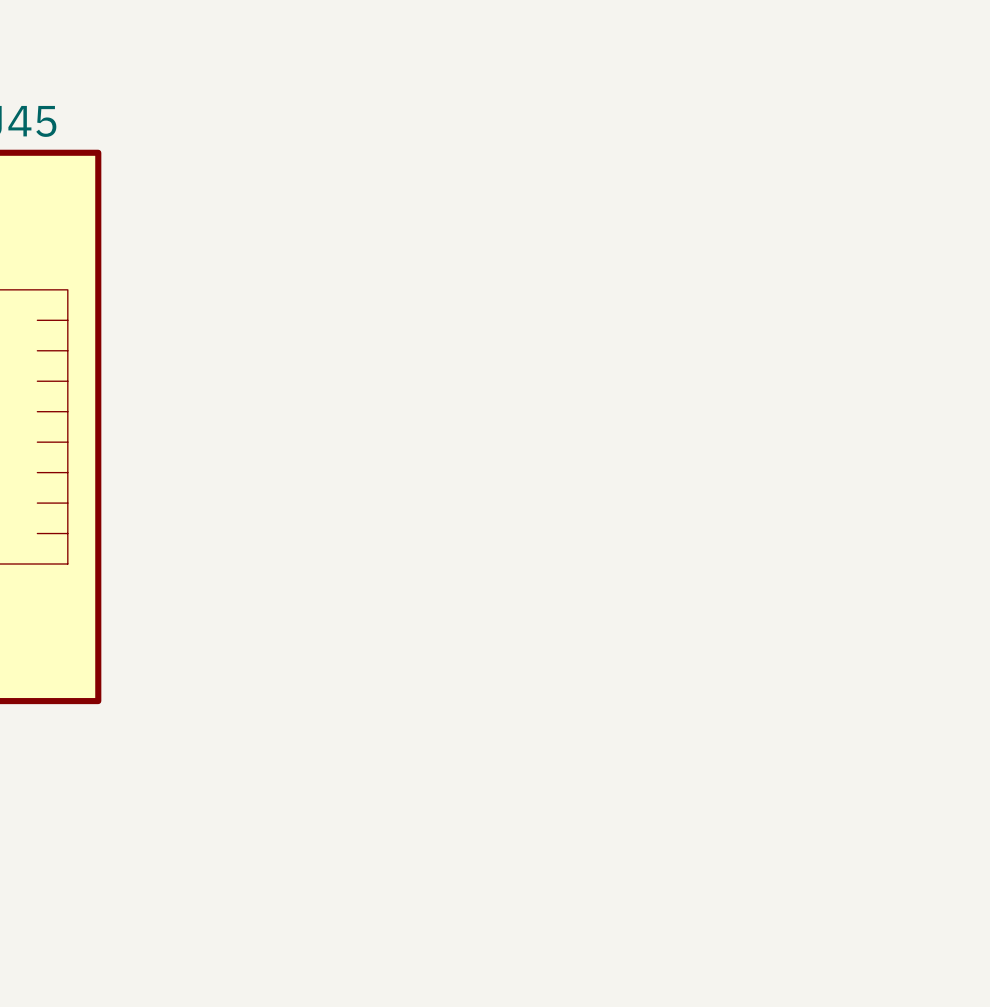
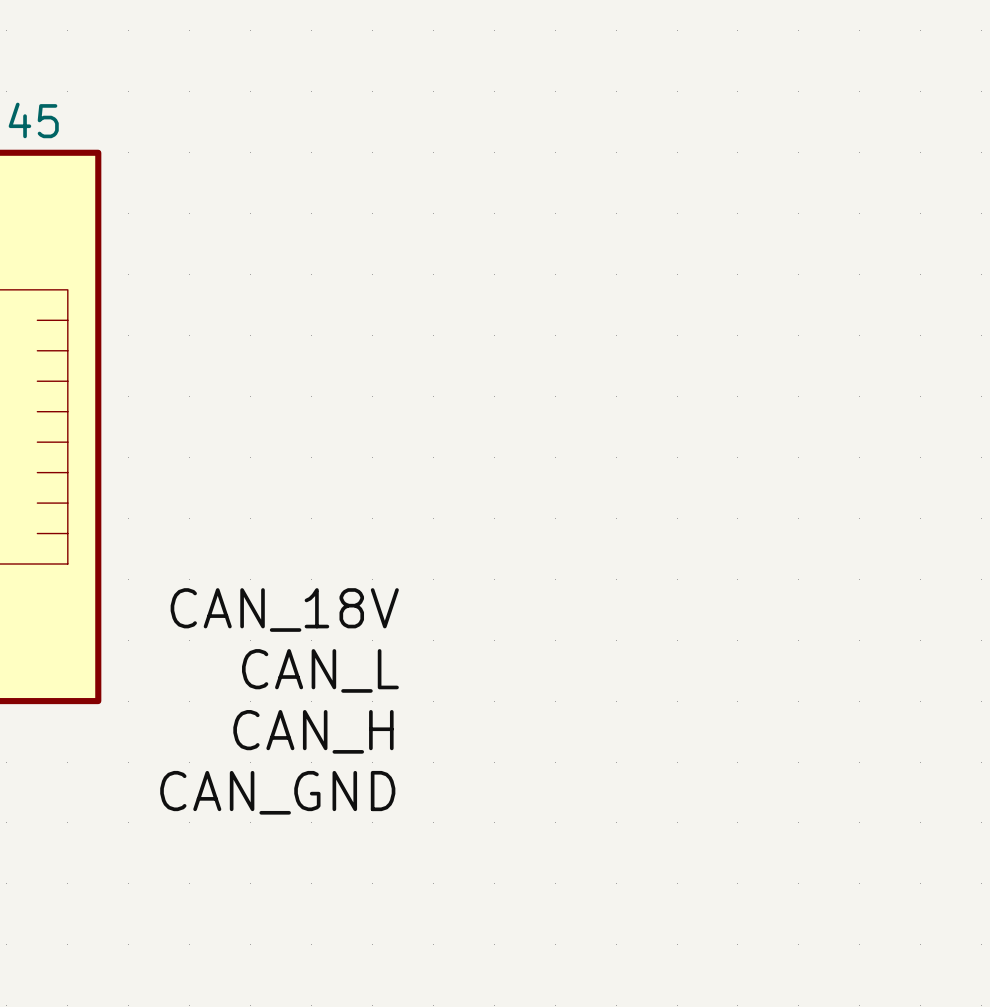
label: none -> CAN_18V (284, 610)
label: none -> CAN_L (320, 670)
label: none -> CAN_H (313, 731)
label: none -> CAN_GND (277, 792)

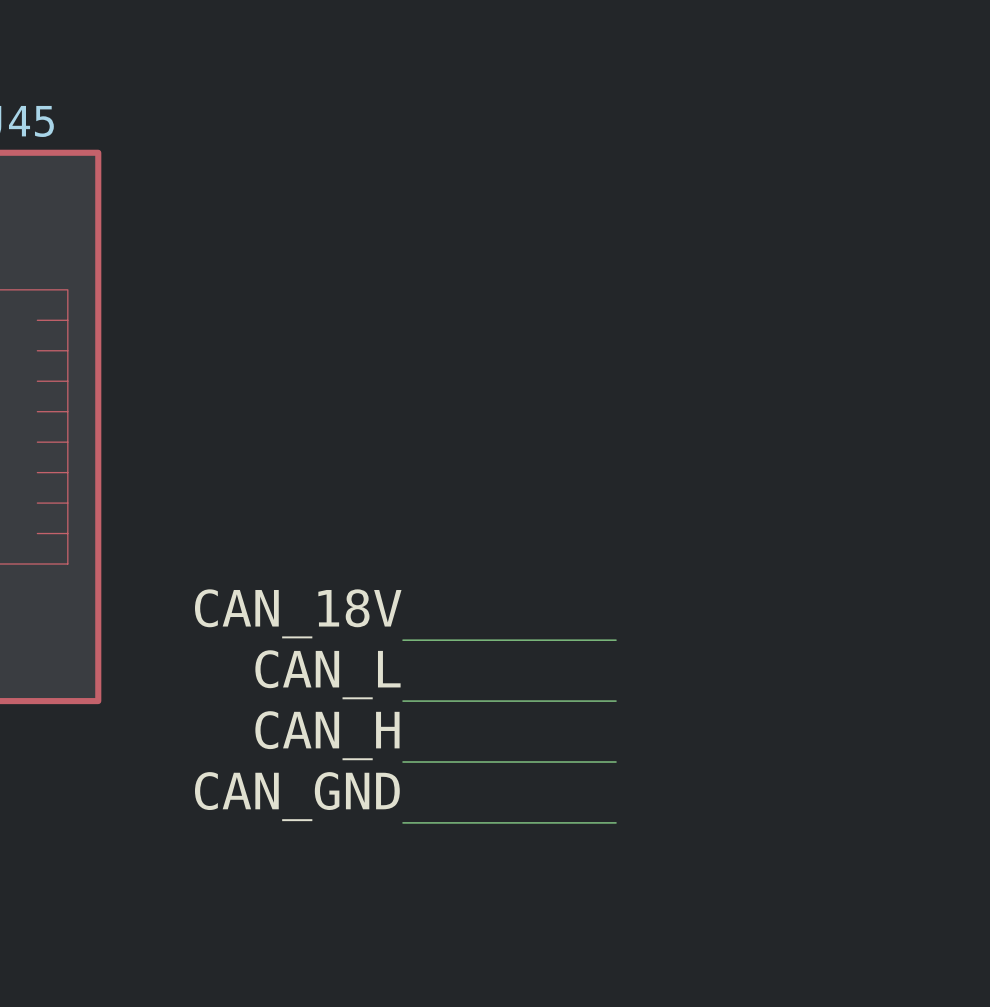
wire: none -> (402, 640) (616, 640)
wire: none -> (402, 701) (616, 701)
wire: none -> (402, 762) (616, 762)
wire: none -> (402, 822) (616, 822)

